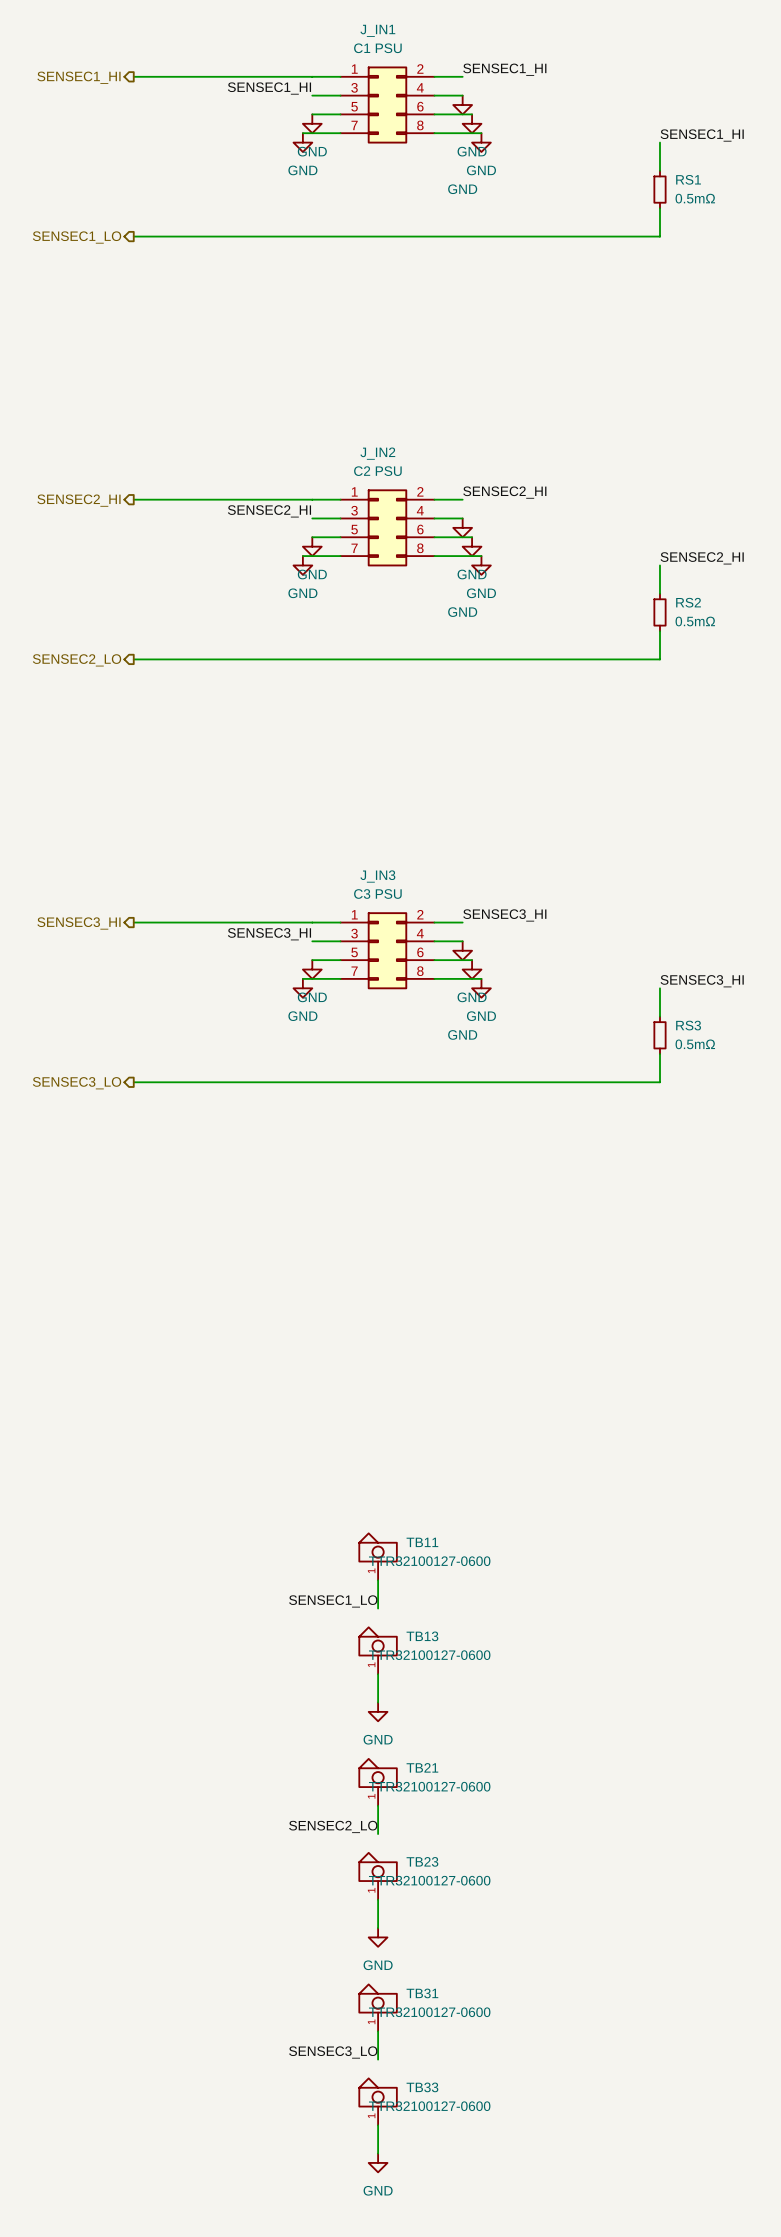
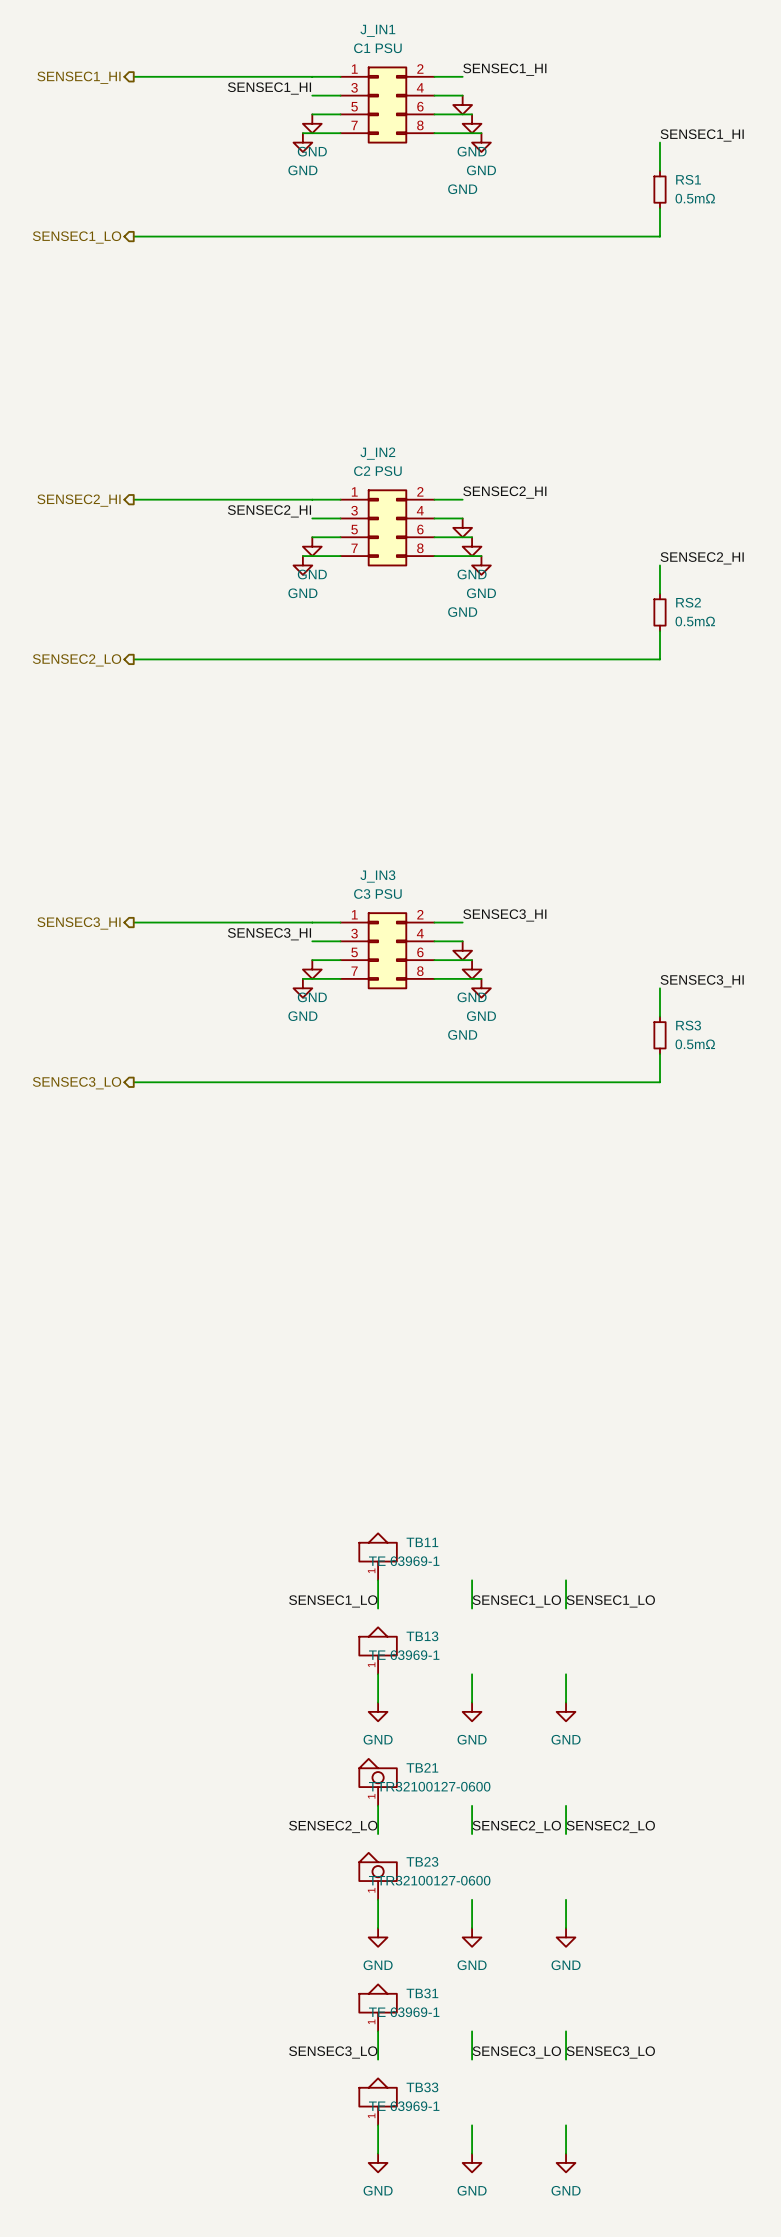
TB11 symbol: [358, 1532, 398, 1581] -> [358, 1532, 398, 1581]
TB11 value: TTR32100127-0600 (429, 1561) -> TE 63969-1 (404, 1561)
wire: none -> (472, 1580) (472, 1608)
wire: none -> (566, 1580) (566, 1608)
label: none -> SENSEC1_LO (516, 1601)
label: none -> SENSEC1_LO (610, 1601)
TB13 symbol: [358, 1626, 398, 1675] -> [358, 1626, 398, 1675]
TB13 value: TTR32100127-0600 (429, 1655) -> TE 63969-1 (404, 1655)
wire: none -> (472, 1674) (472, 1702)
wire: none -> (566, 1674) (566, 1702)
power symbol: none -> GND (472, 1711)
power symbol: none -> GND (566, 1711)
wire: none -> (472, 1805) (472, 1834)
wire: none -> (566, 1805) (566, 1834)
label: none -> SENSEC2_LO (516, 1826)
label: none -> SENSEC2_LO (610, 1826)
wire: none -> (472, 1899) (472, 1928)
wire: none -> (566, 1899) (566, 1928)
power symbol: none -> GND (472, 1937)
power symbol: none -> GND (566, 1937)
TB31 symbol: [358, 1983, 398, 2032] -> [358, 1983, 398, 2032]
TB31 value: TTR32100127-0600 (429, 2012) -> TE 63969-1 (404, 2012)
wire: none -> (472, 2031) (472, 2059)
wire: none -> (566, 2031) (566, 2059)
label: none -> SENSEC3_LO (516, 2052)
label: none -> SENSEC3_LO (610, 2052)
TB33 symbol: [358, 2077, 398, 2126] -> [358, 2077, 398, 2126]
TB33 value: TTR32100127-0600 (429, 2106) -> TE 63969-1 (404, 2106)
wire: none -> (472, 2125) (472, 2153)
wire: none -> (566, 2125) (566, 2153)
power symbol: none -> GND (472, 2162)
power symbol: none -> GND (566, 2162)

